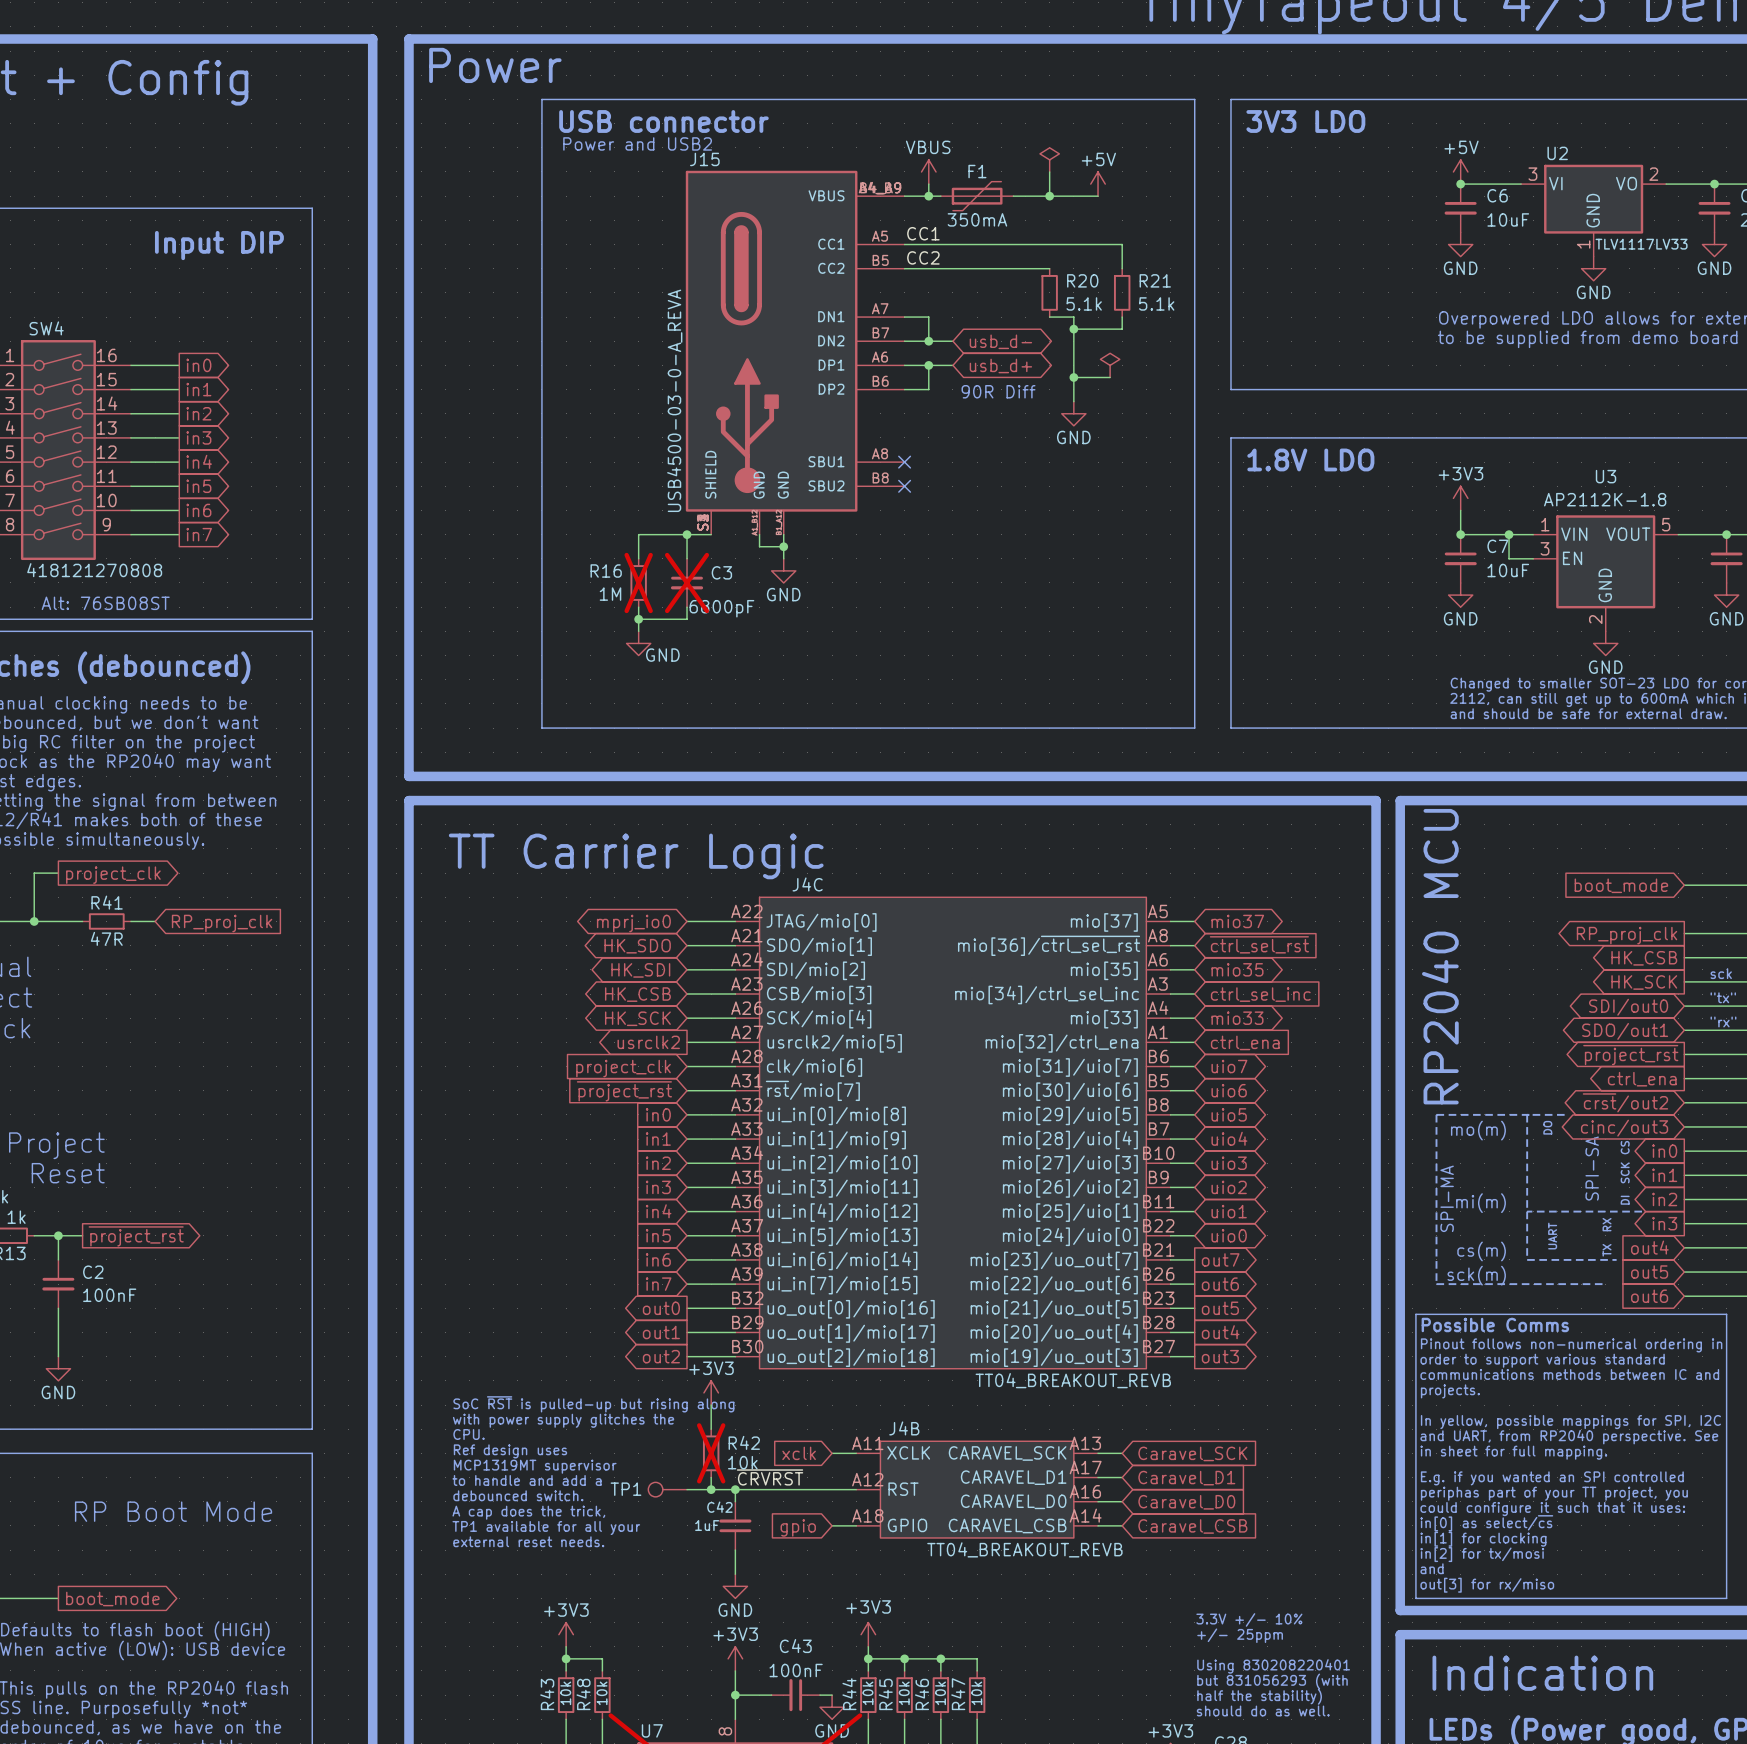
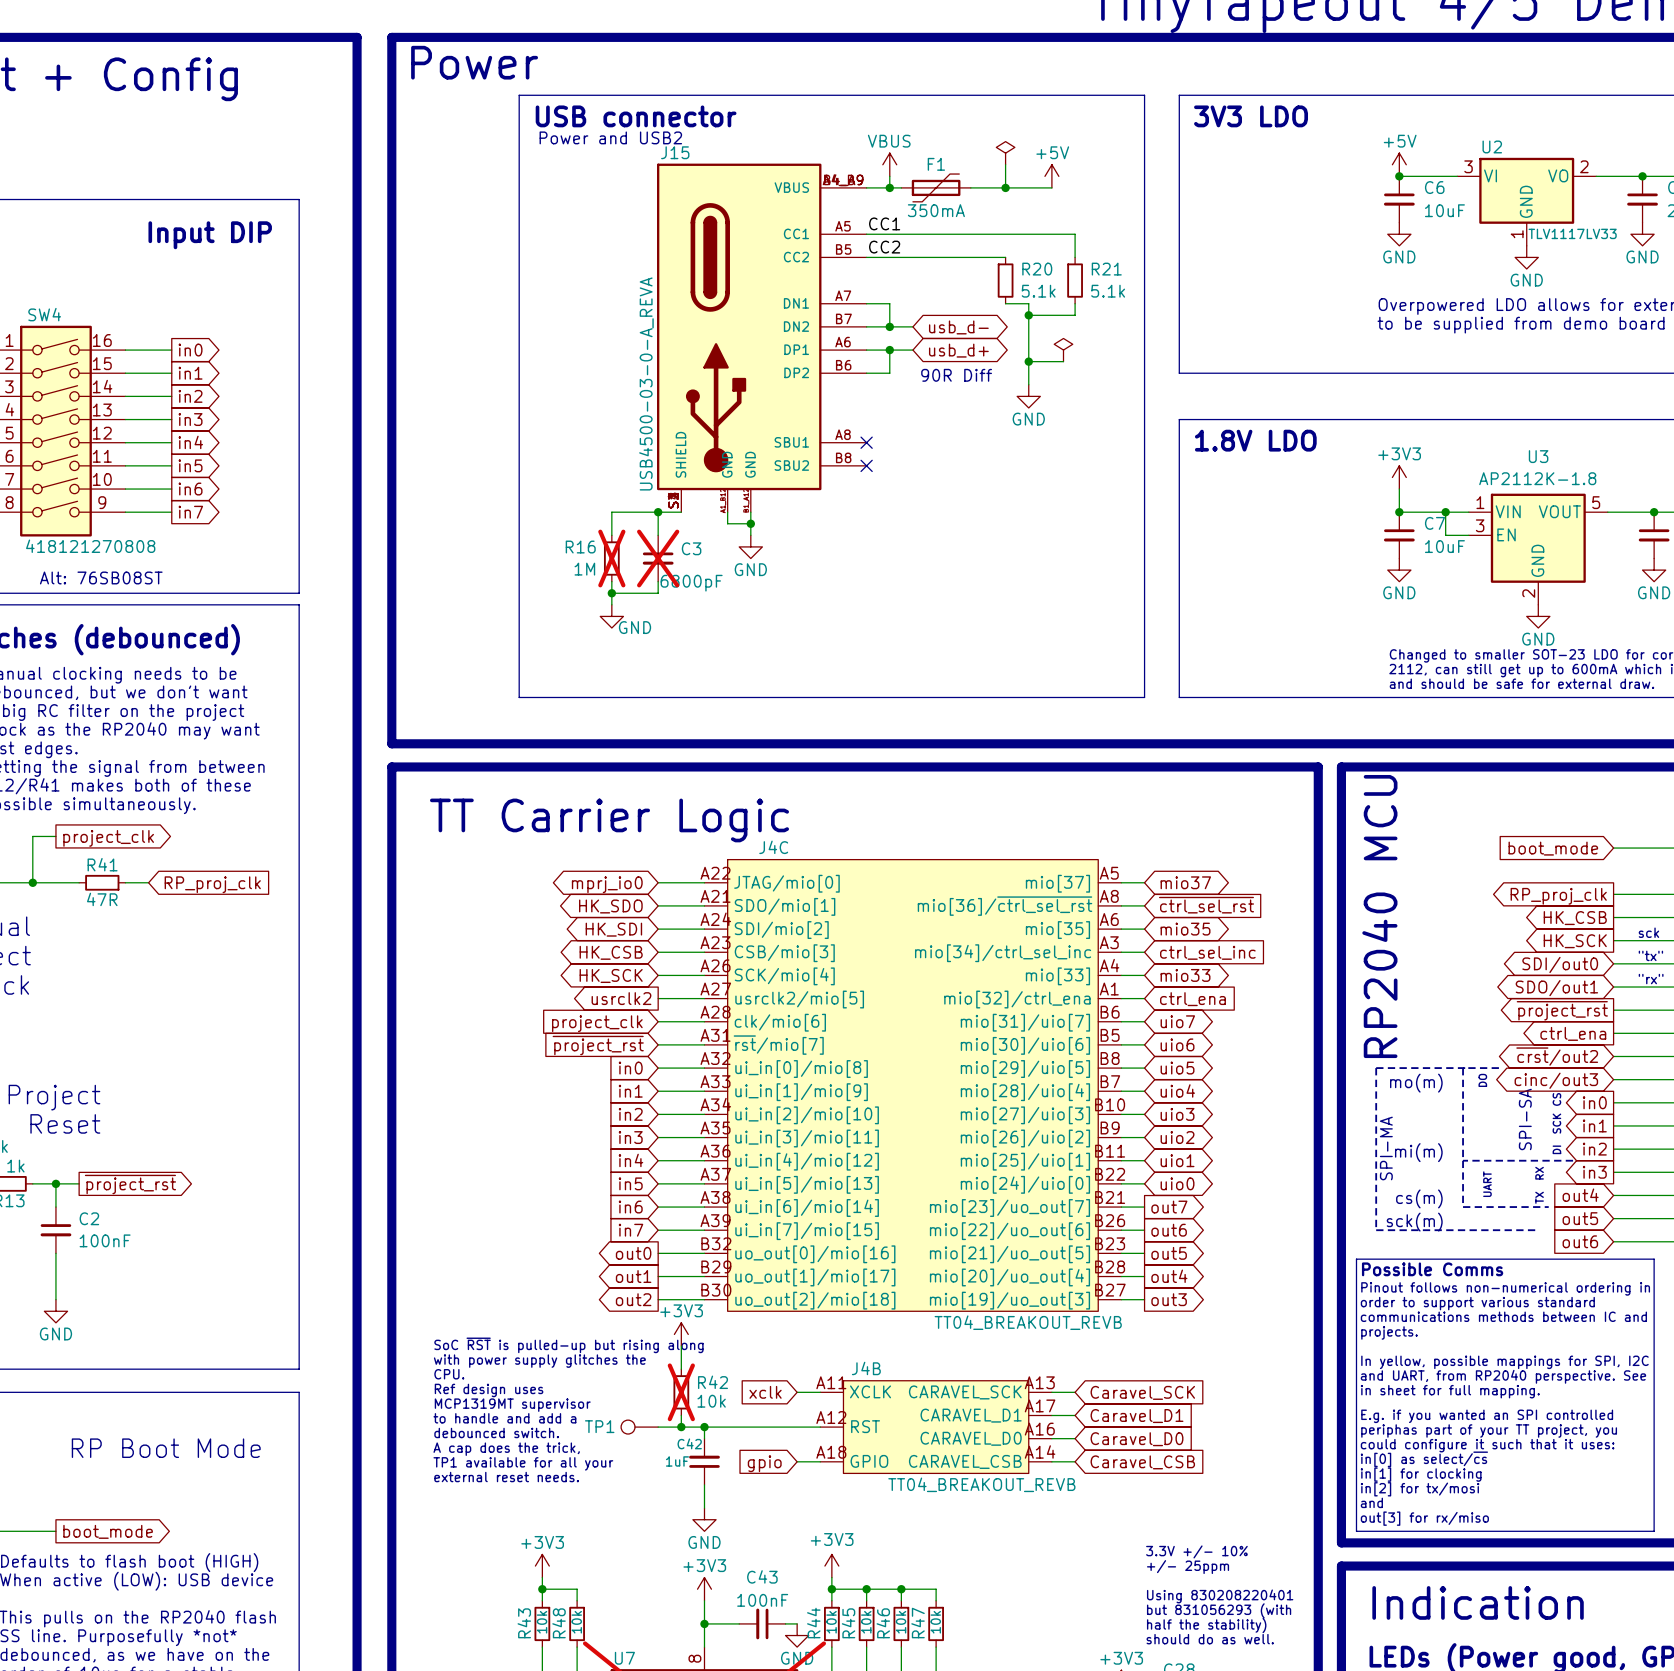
label: ~{CRVRST} (770, 1477) -> none

